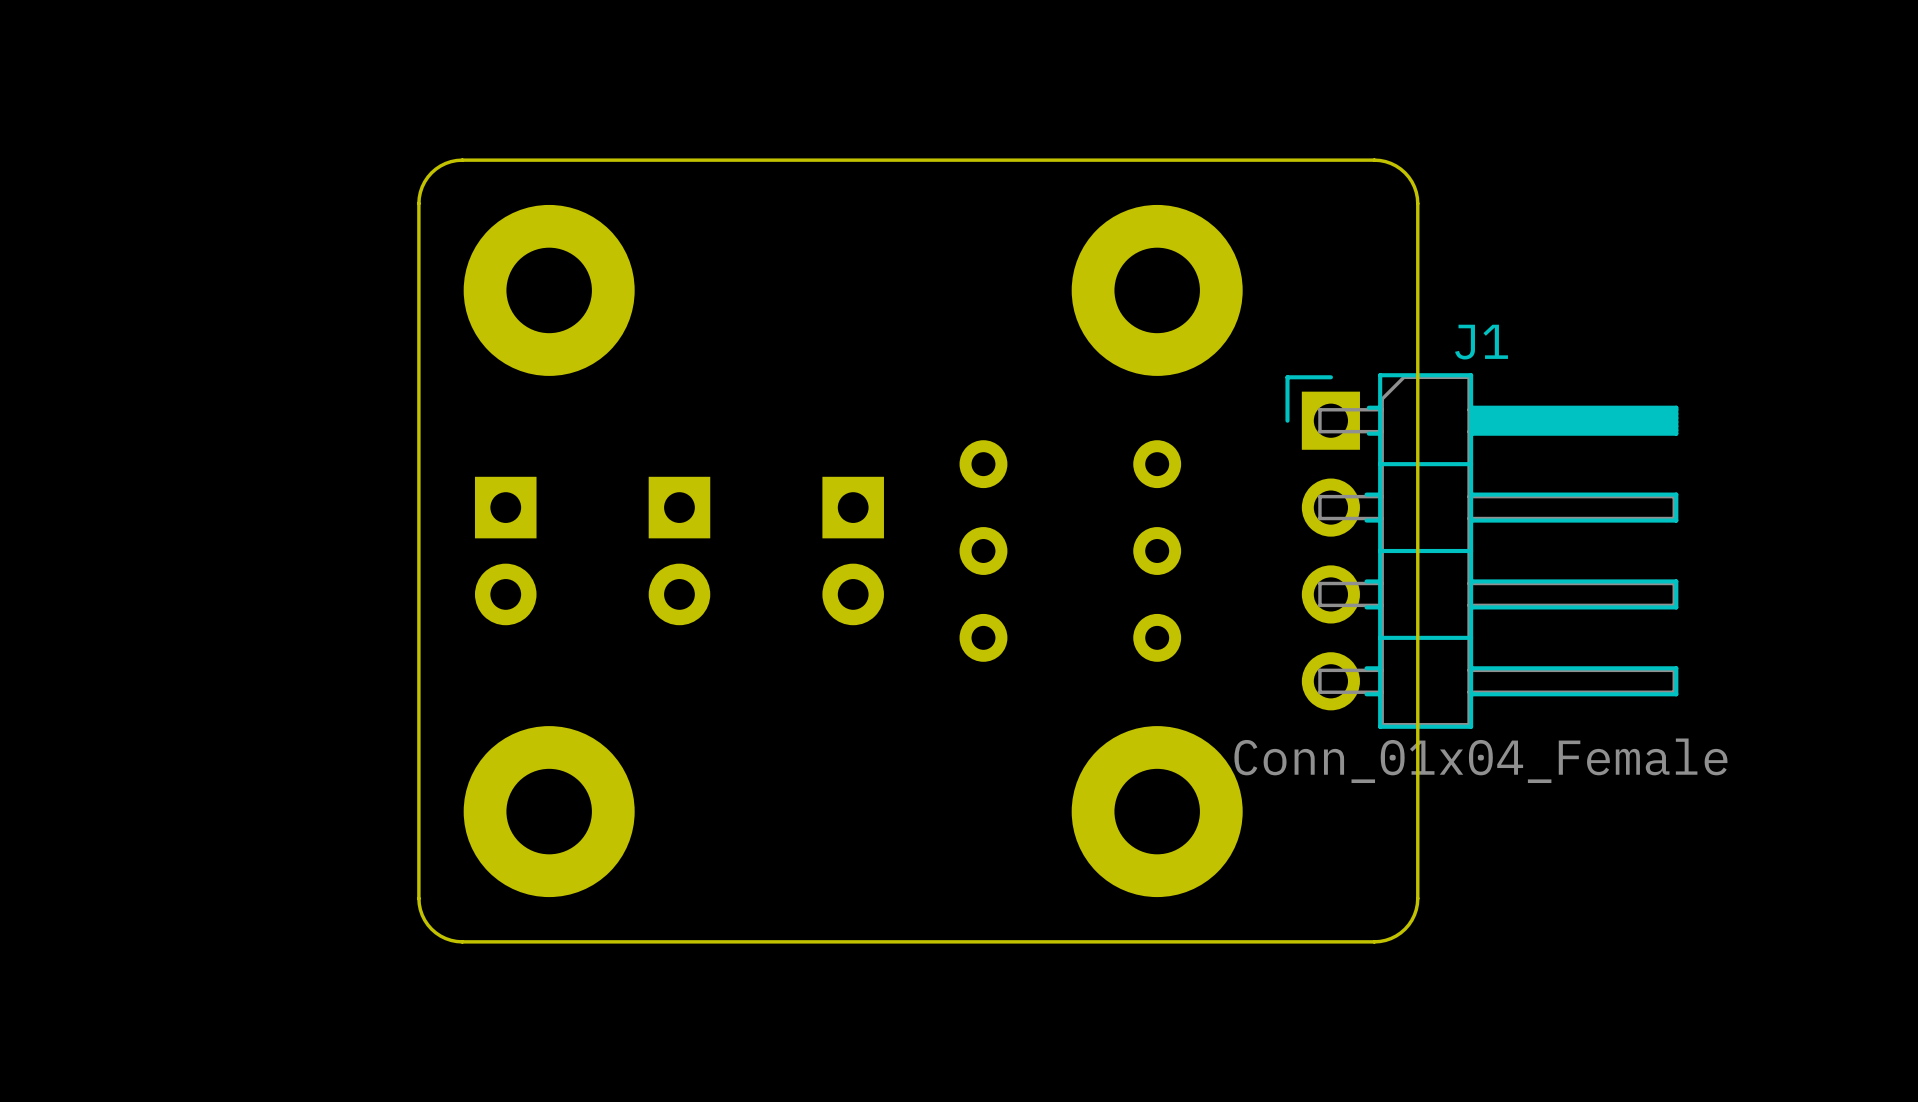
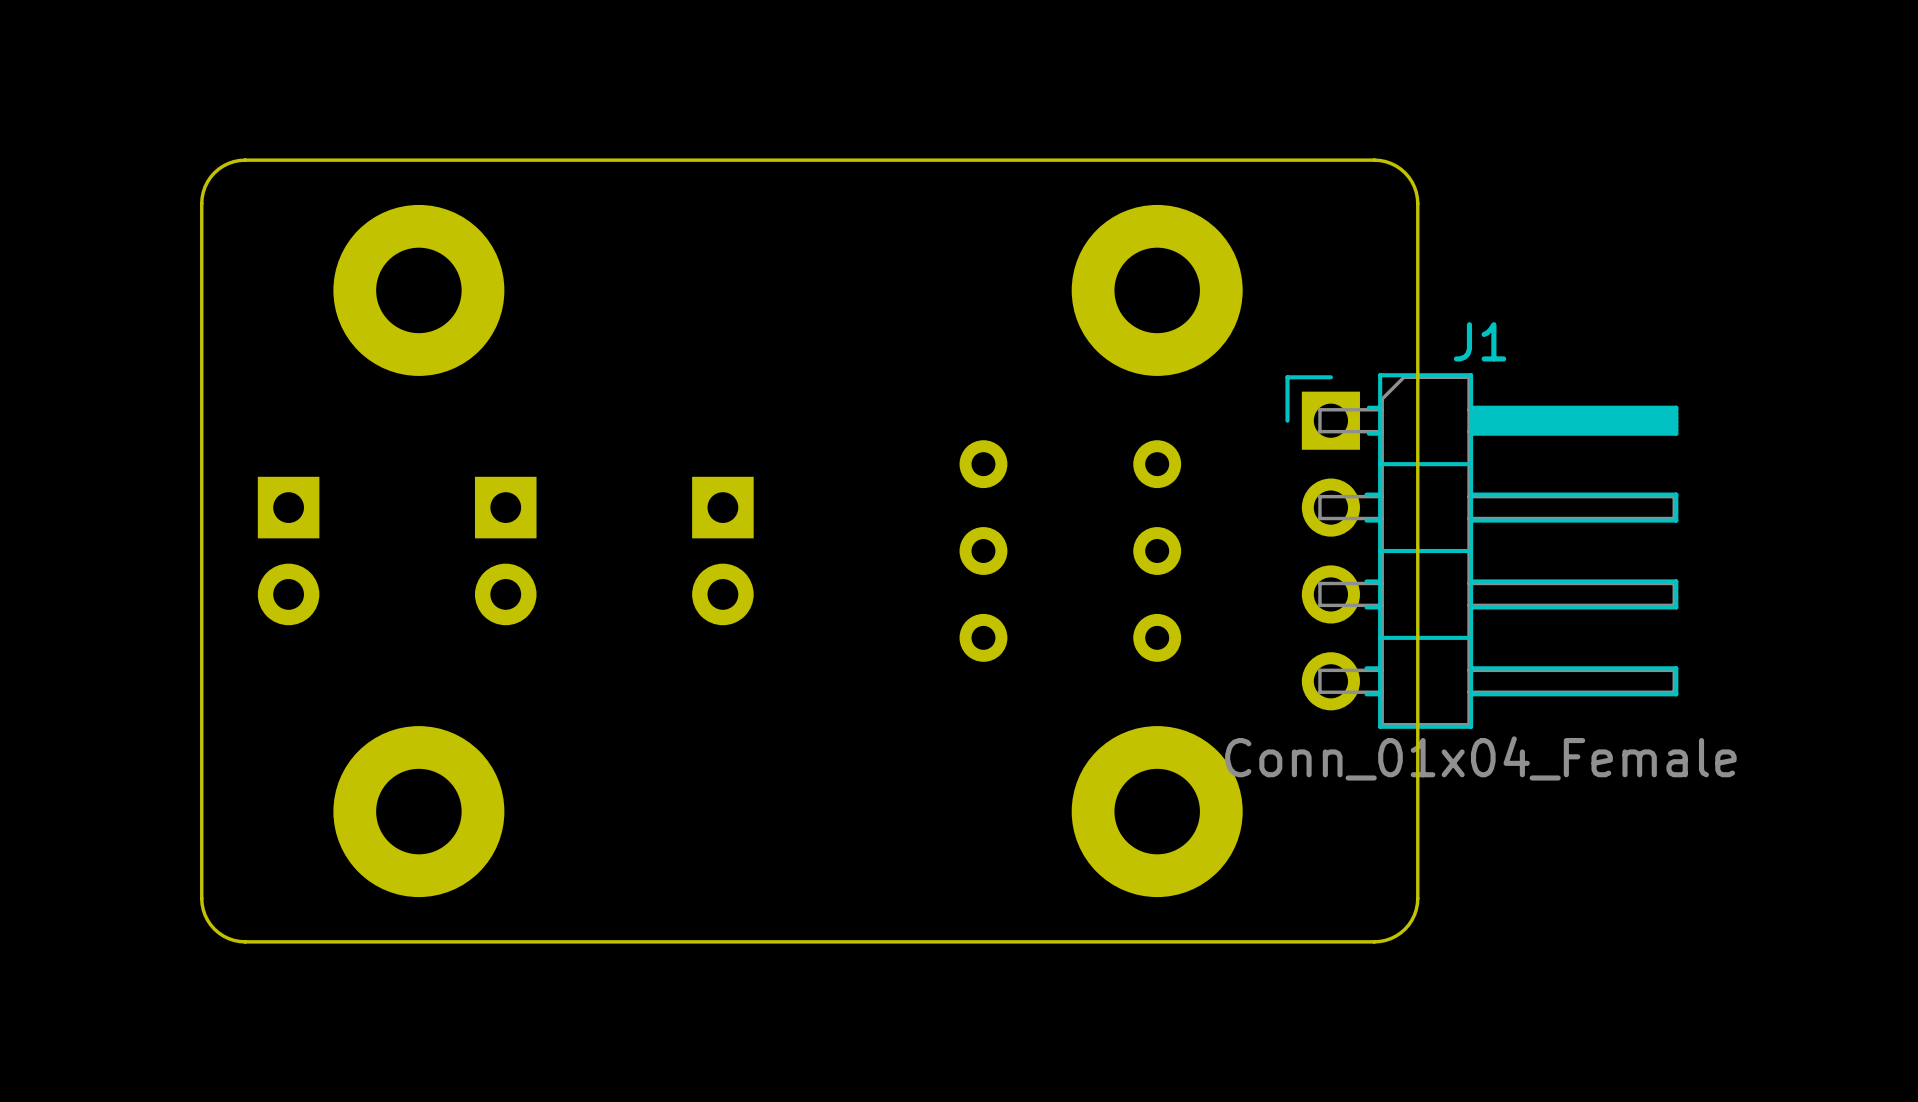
board edge: (462, 160) (445, 163) (431, 172) (422, 186) (418, 203) (418, 898) (422, 915) (431, 929) (445, 938) (462, 941) -> (462, 160) (239, 160) (223, 165) (214, 172) (205, 186) (201, 203) (201, 898) (205, 915) (218, 932) (239, 941) (462, 941)
part position: (549, 290) -> (418, 290)
part: none -> (288, 551)
part position: (679, 551) -> (722, 551)
part: (853, 551) -> none
part position: (549, 811) -> (418, 811)

